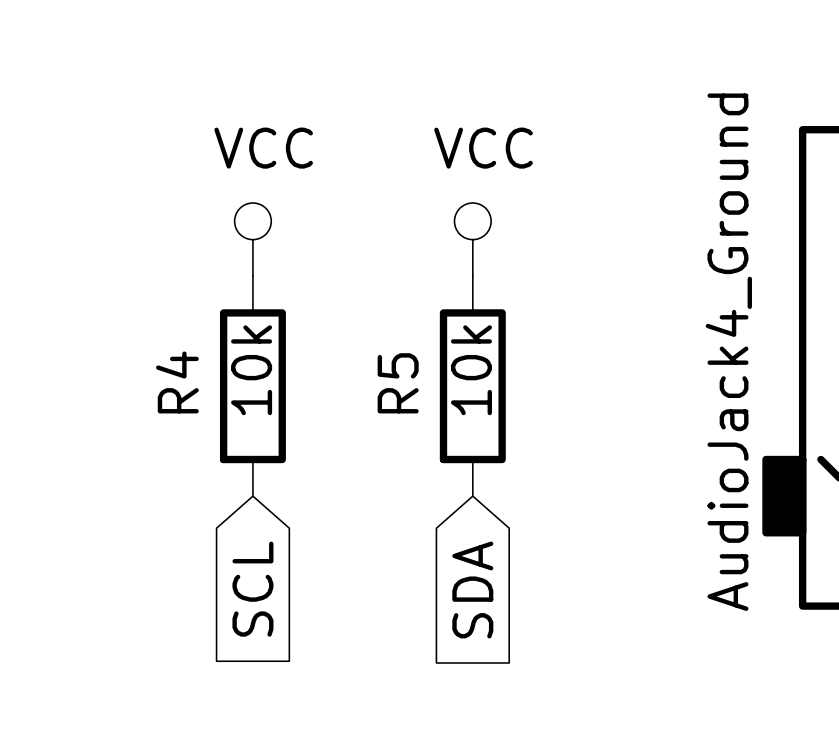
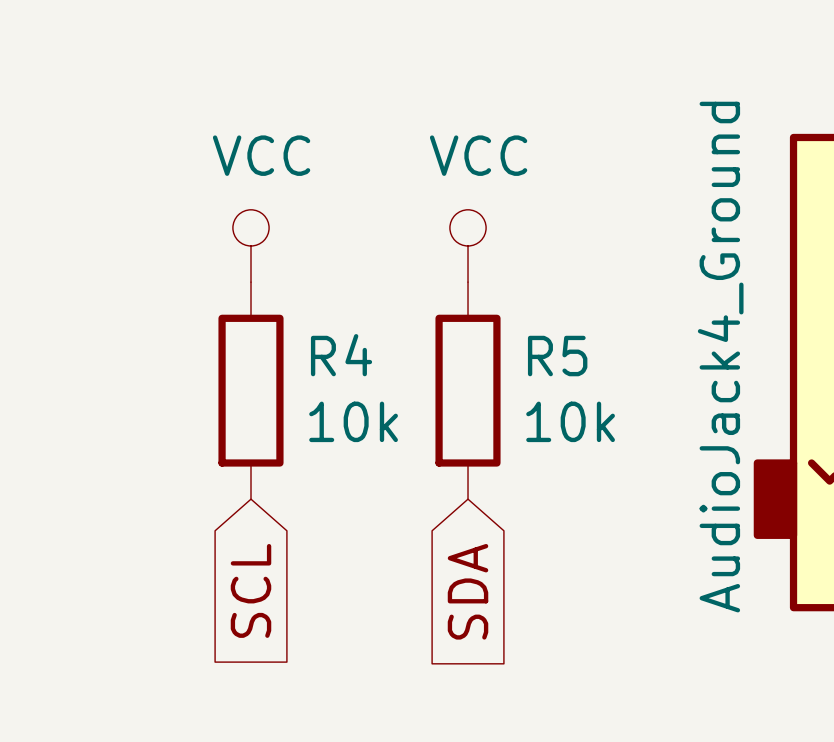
R4 value rotation: 0° (251, 370) -> 90° clockwise (353, 421)
R4 value position: 10k (251, 370) -> 10k (353, 421)
R5 value rotation: 0° (471, 370) -> 90° clockwise (570, 421)
R5 value position: 10k (471, 370) -> 10k (570, 421)
R4 name rotation: 0° (177, 382) -> 90° clockwise (341, 355)
R4 name position: R4 (177, 382) -> R4 (341, 355)
R5 name rotation: 0° (398, 383) -> 90° clockwise (557, 356)
R5 name position: R5 (398, 383) -> R5 (557, 356)

